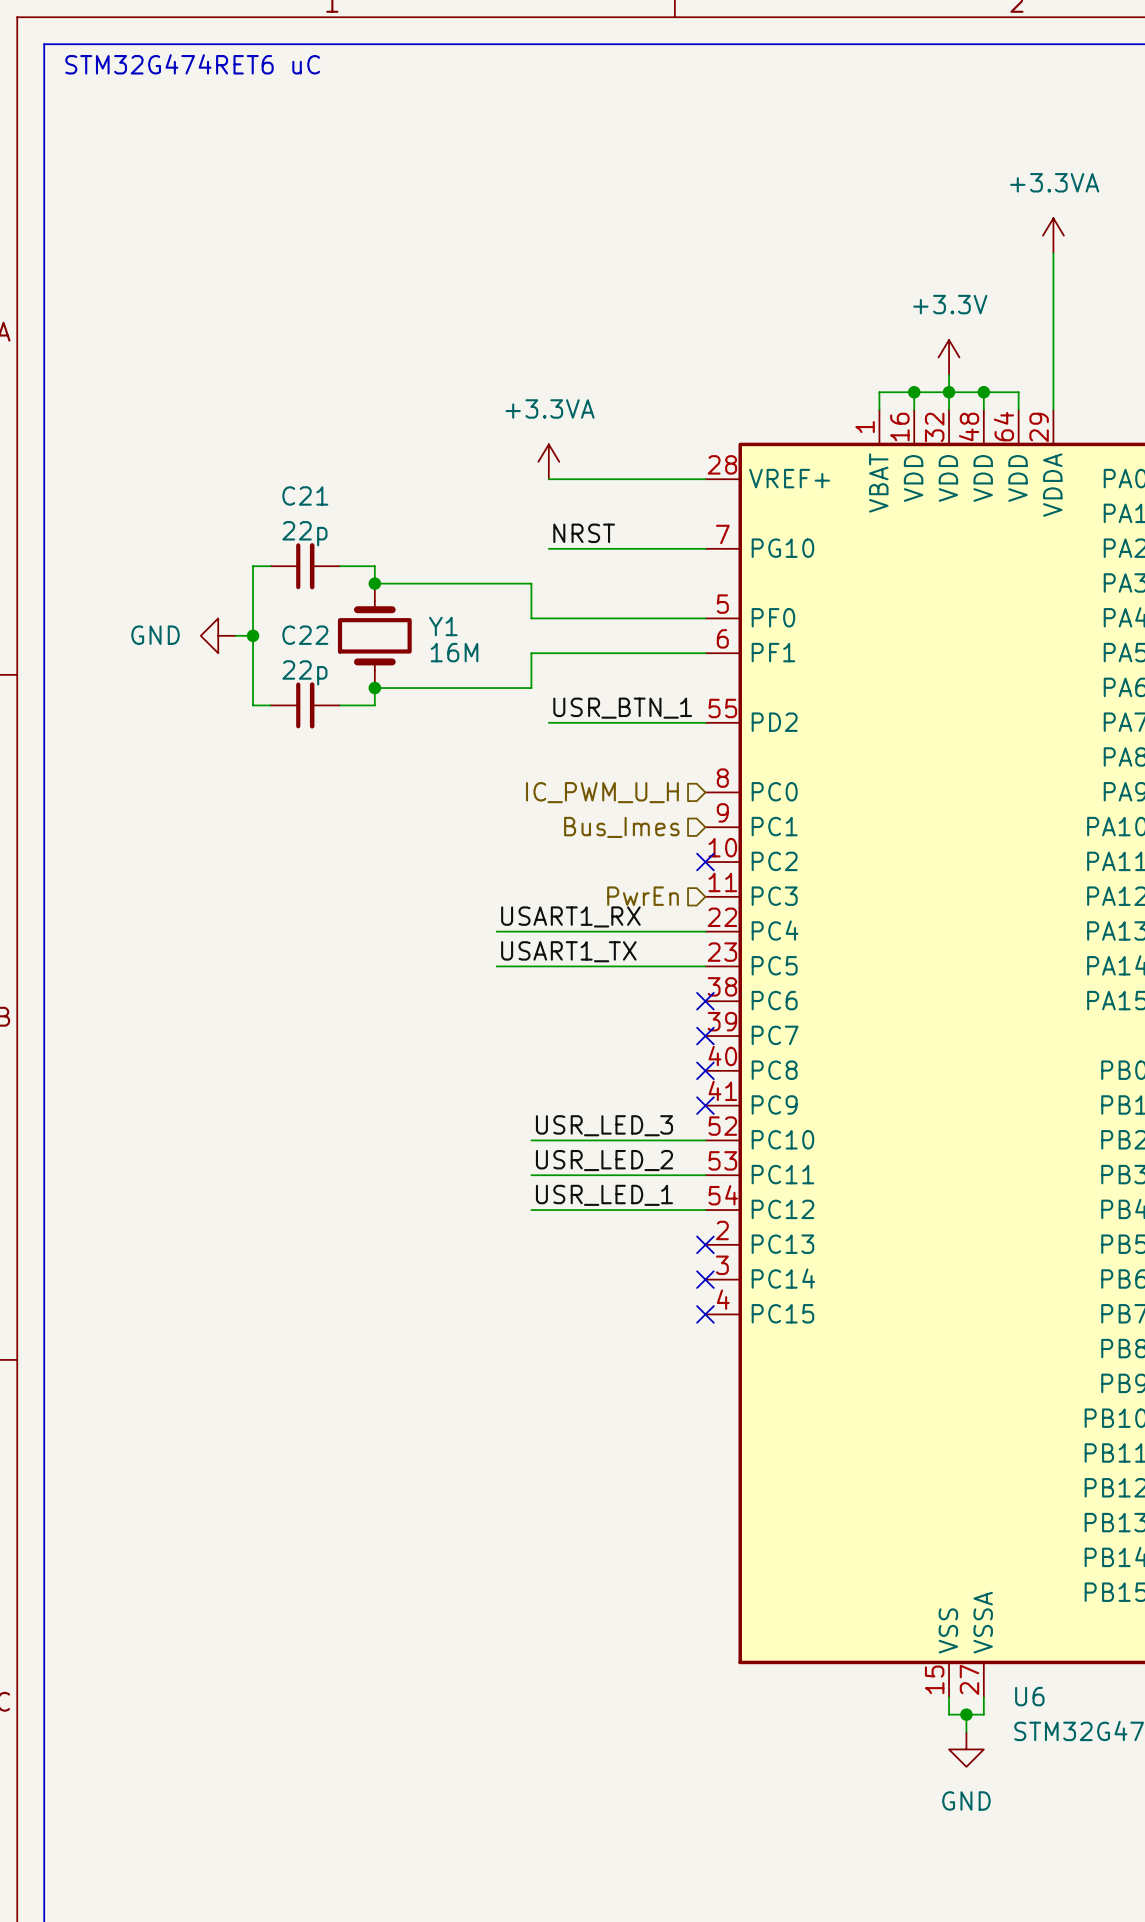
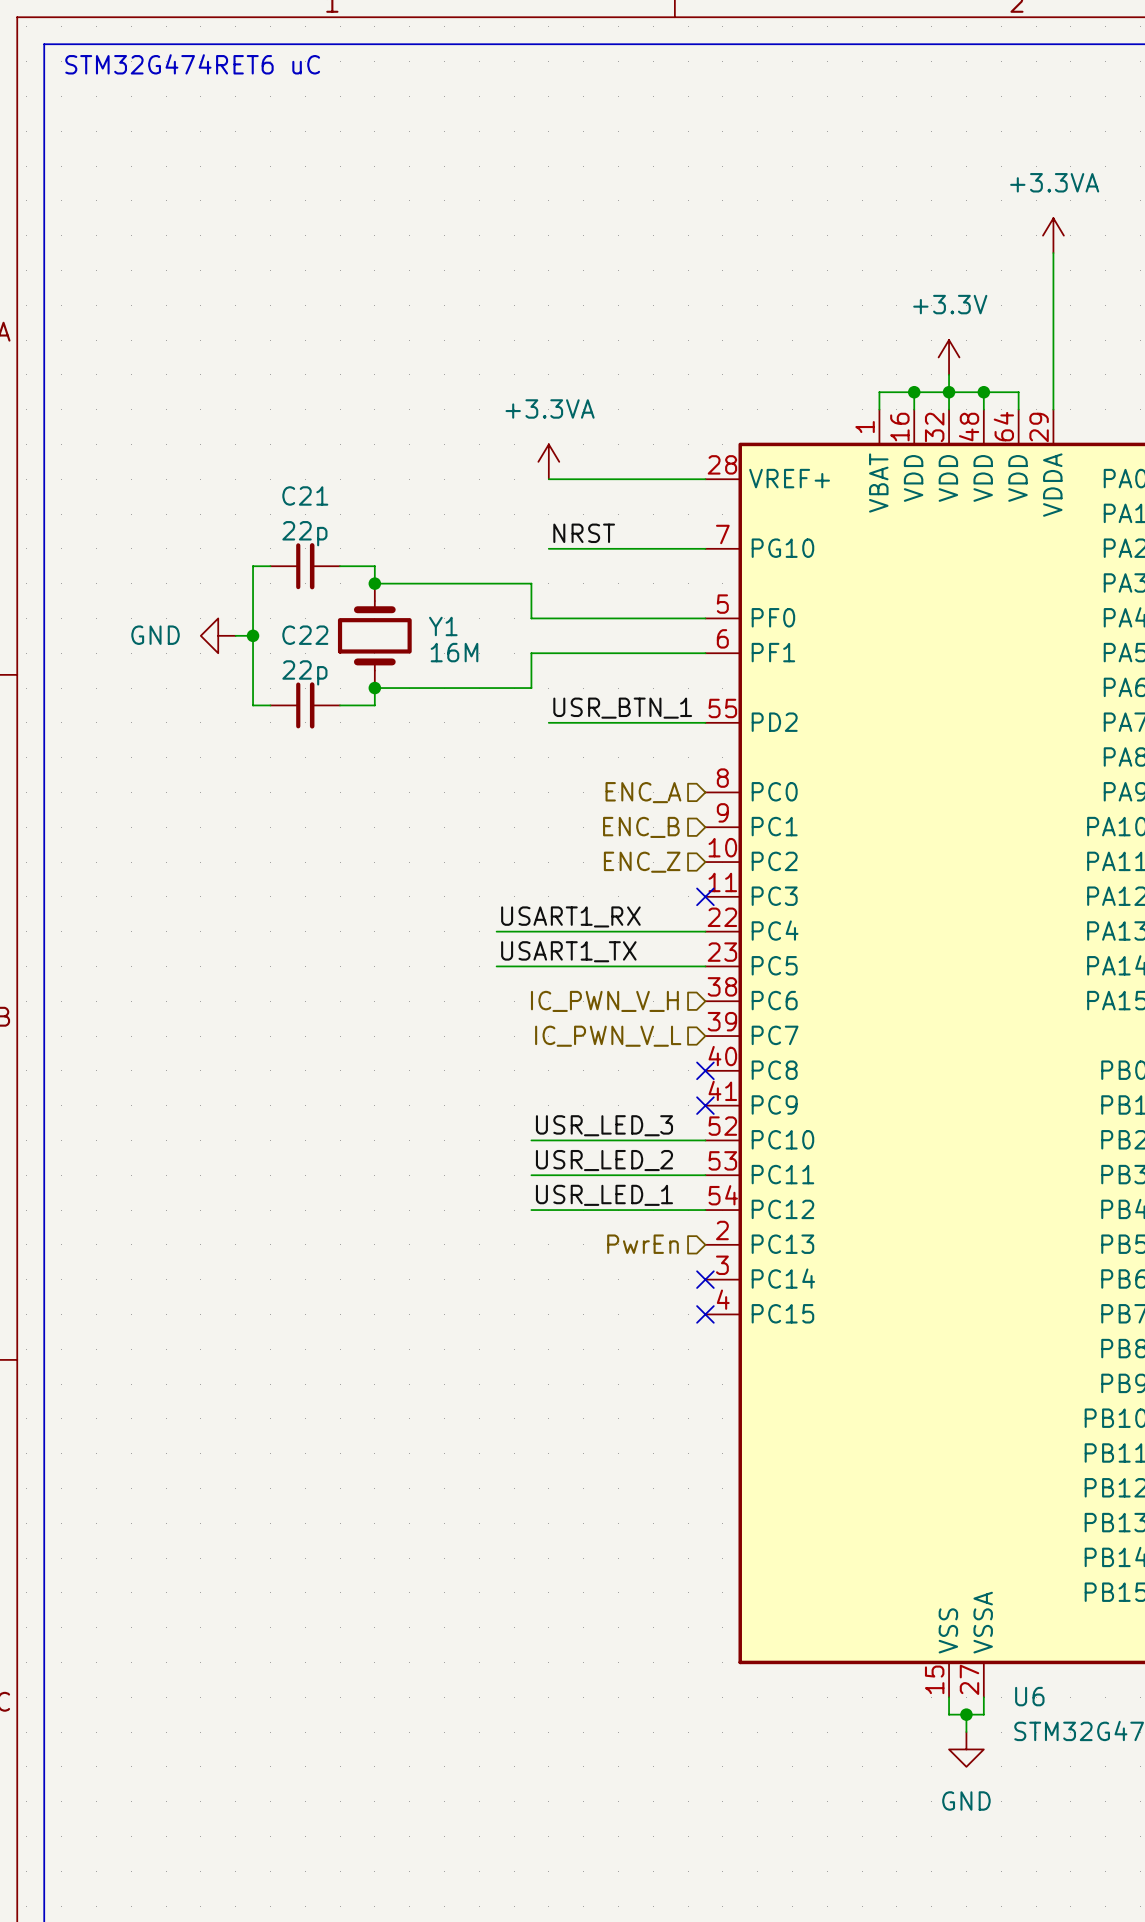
hierarchical label: IC_PWM_U_H (602, 792) -> ENC_A (643, 792)
hierarchical label: Bus_Imes (621, 827) -> ENC_B (641, 827)
hierarchical label: none -> ENC_Z (642, 862)
no-connect mark position: (705, 862) -> (705, 896)
hierarchical label: PwrEn (643, 896) -> none
hierarchical label: none -> IC_PWN_V_H (604, 1001)
no-connect mark: (705, 1001) -> none
hierarchical label: none -> IC_PWN_V_L (608, 1036)
no-connect mark: (705, 1036) -> none
hierarchical label: none -> PwrEn (643, 1244)
no-connect mark: (705, 1244) -> none

